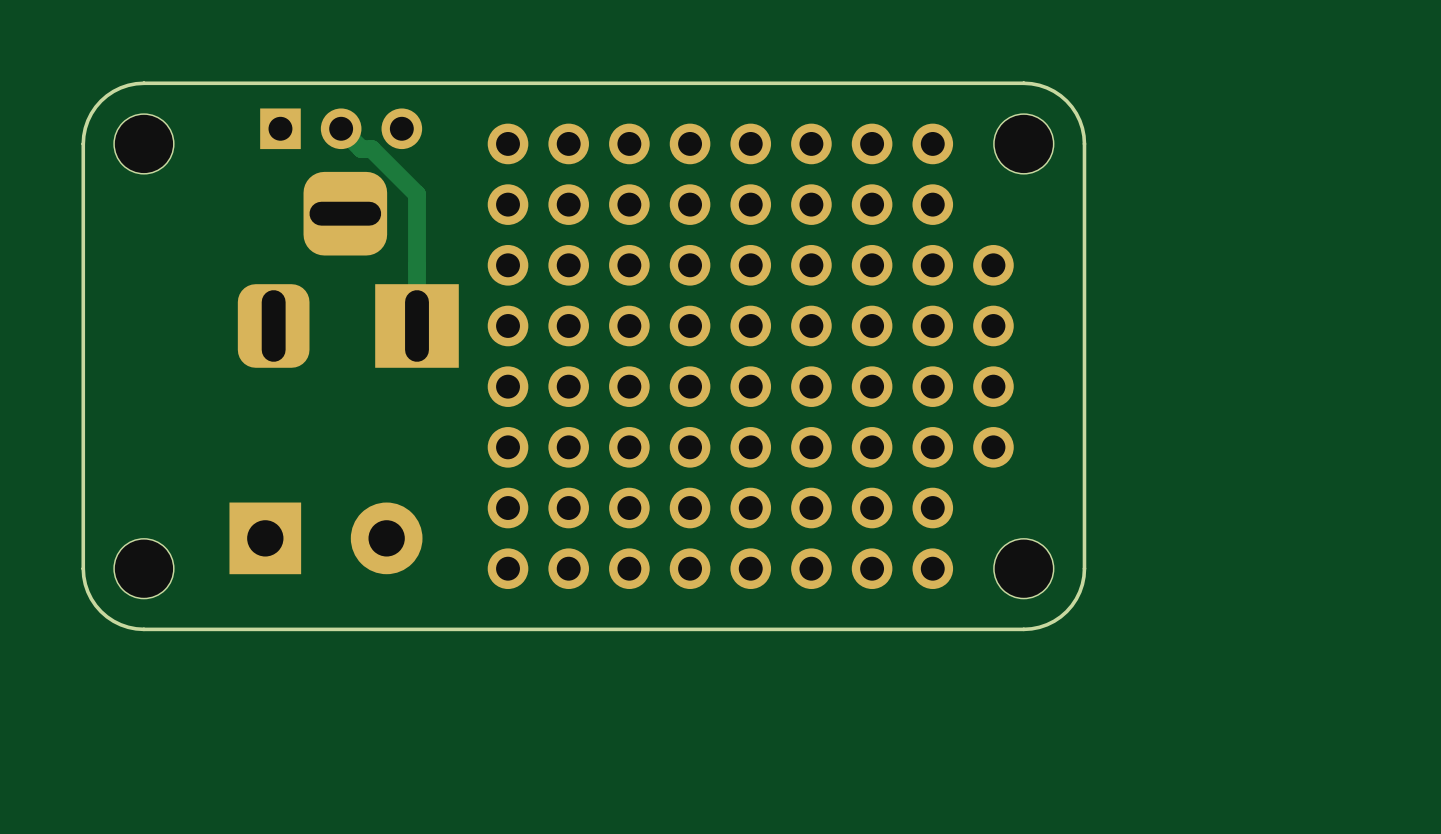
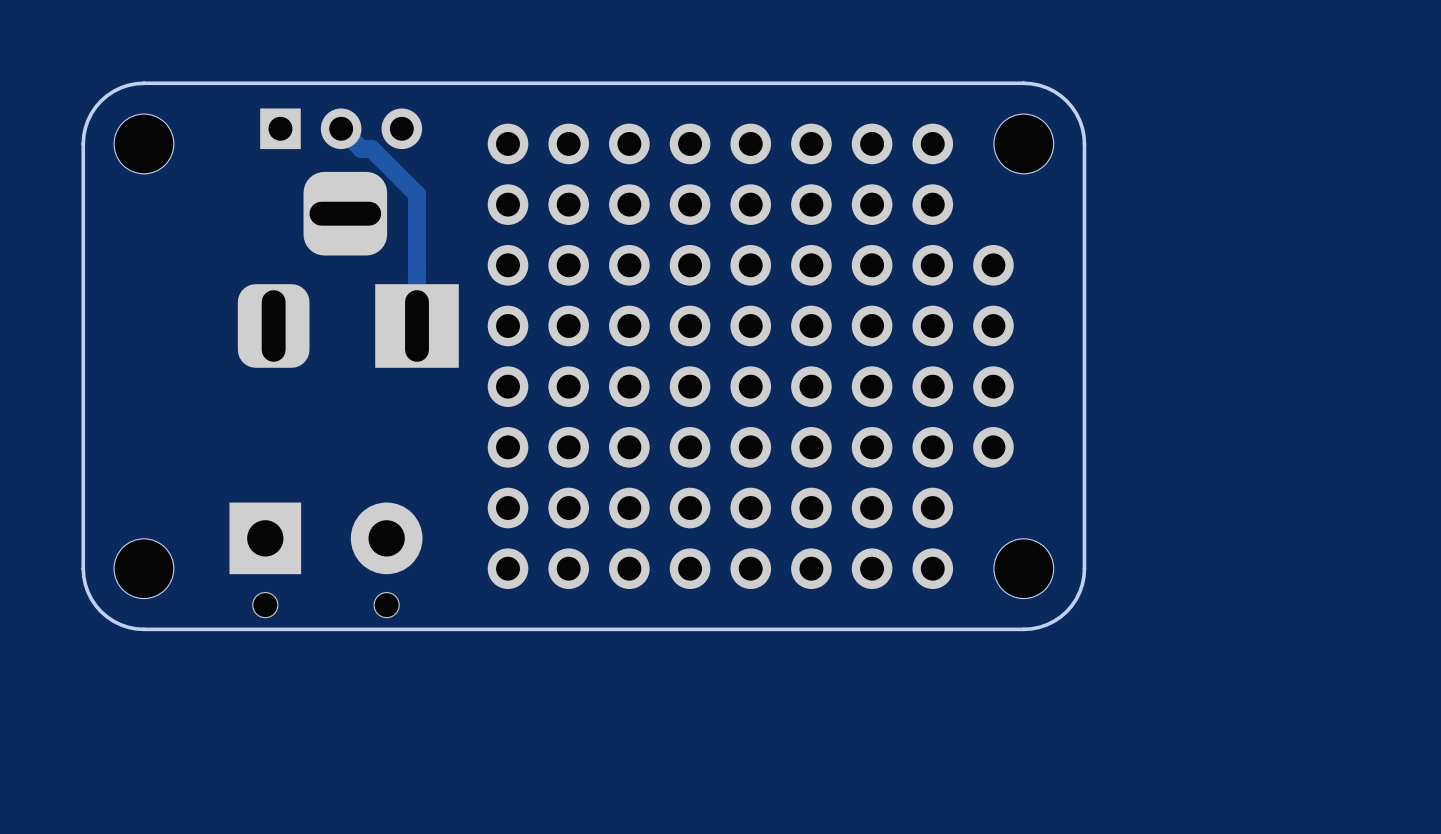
via: none -> (265, 605)
via: none -> (386, 605)

